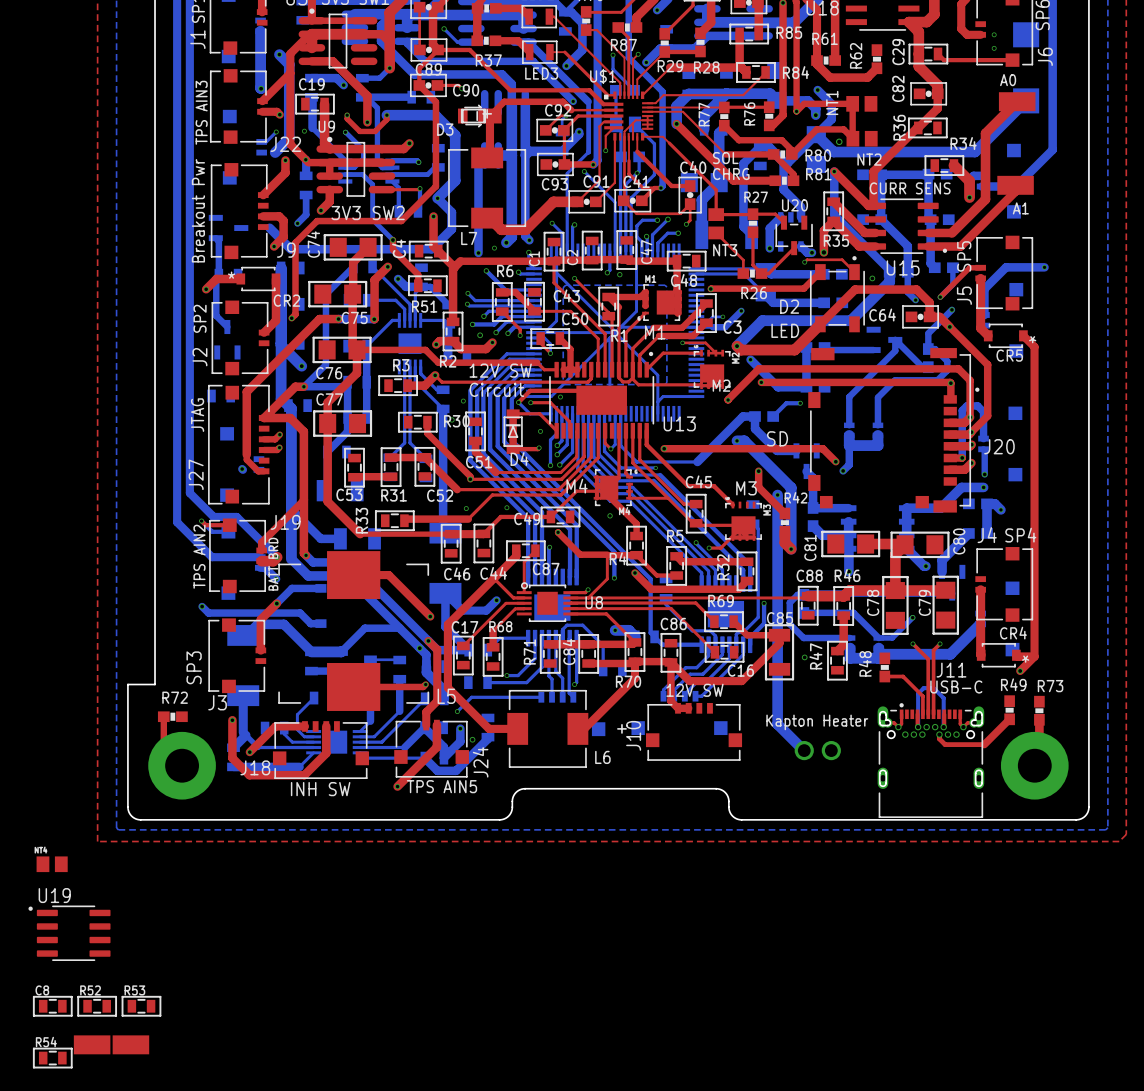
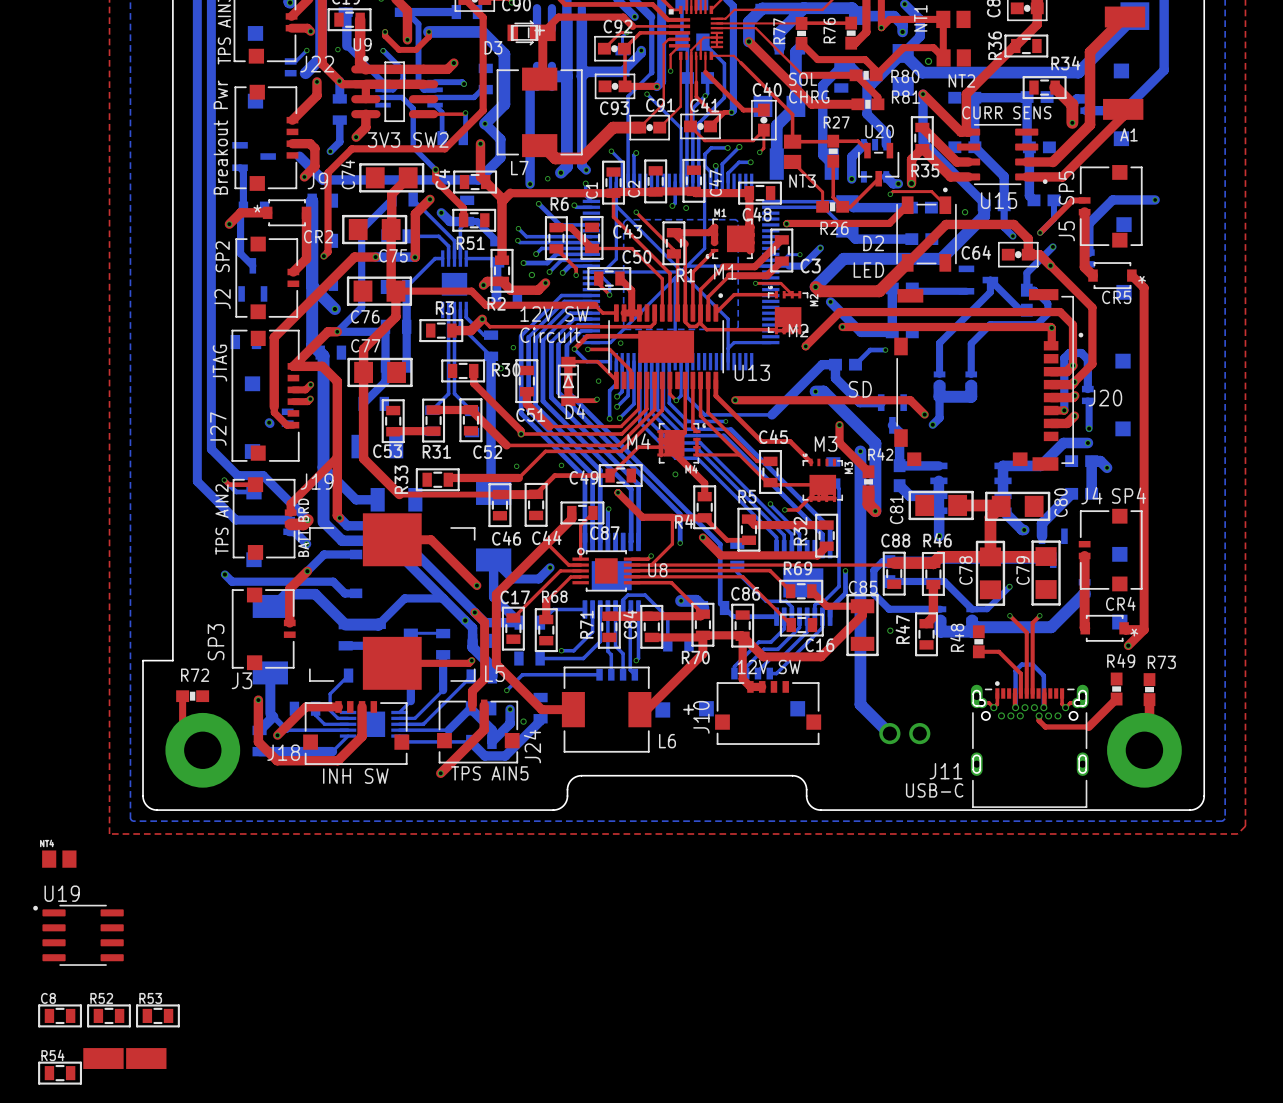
J11 name position: J11 (951, 670) -> J11 (946, 771)
text position: USB-C (956, 686) -> USB-C (934, 790)
text: Kapton Heater (817, 722) -> none

